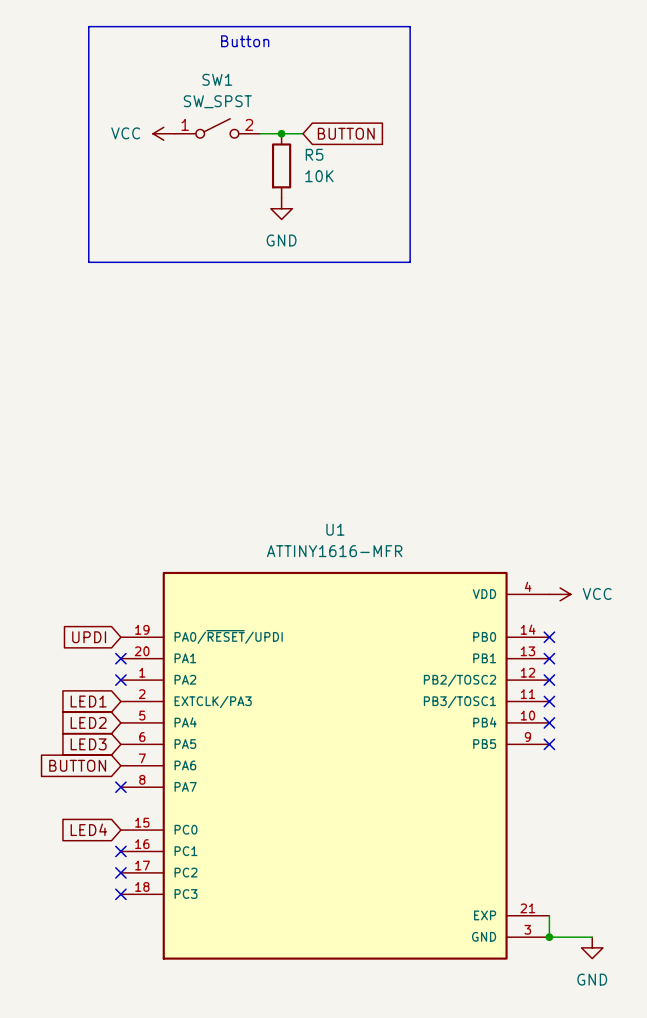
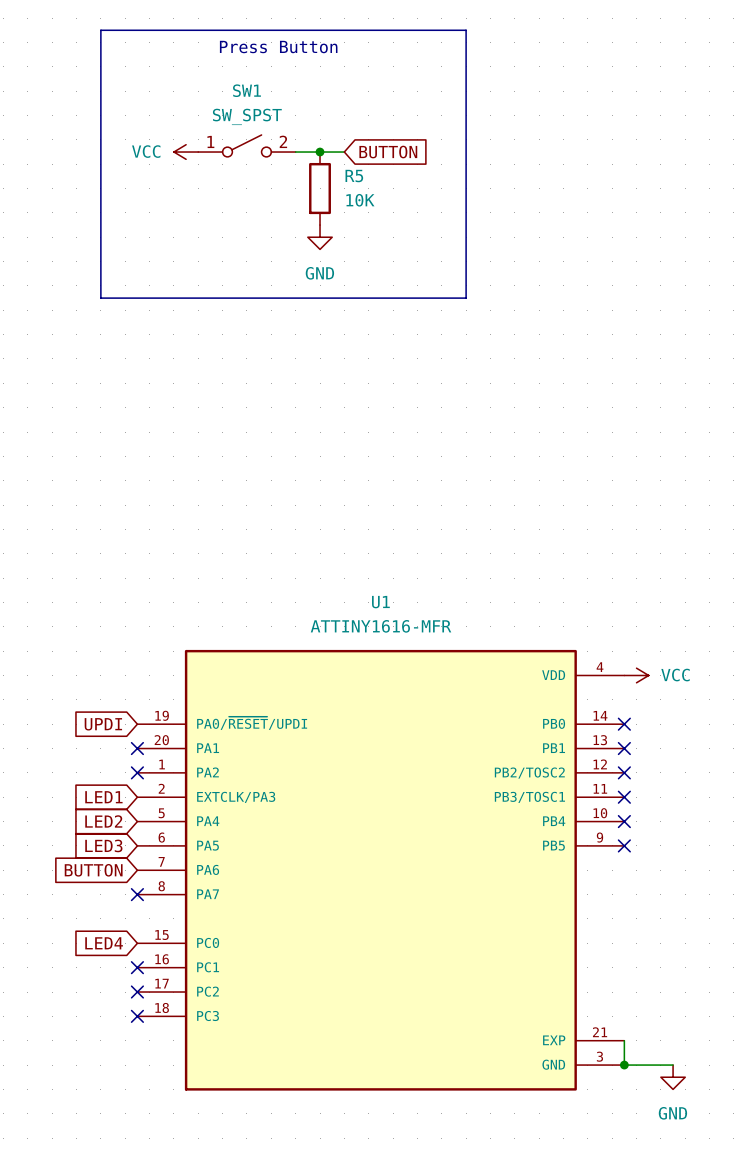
text: Button (245, 41) -> Press Button (278, 47)

